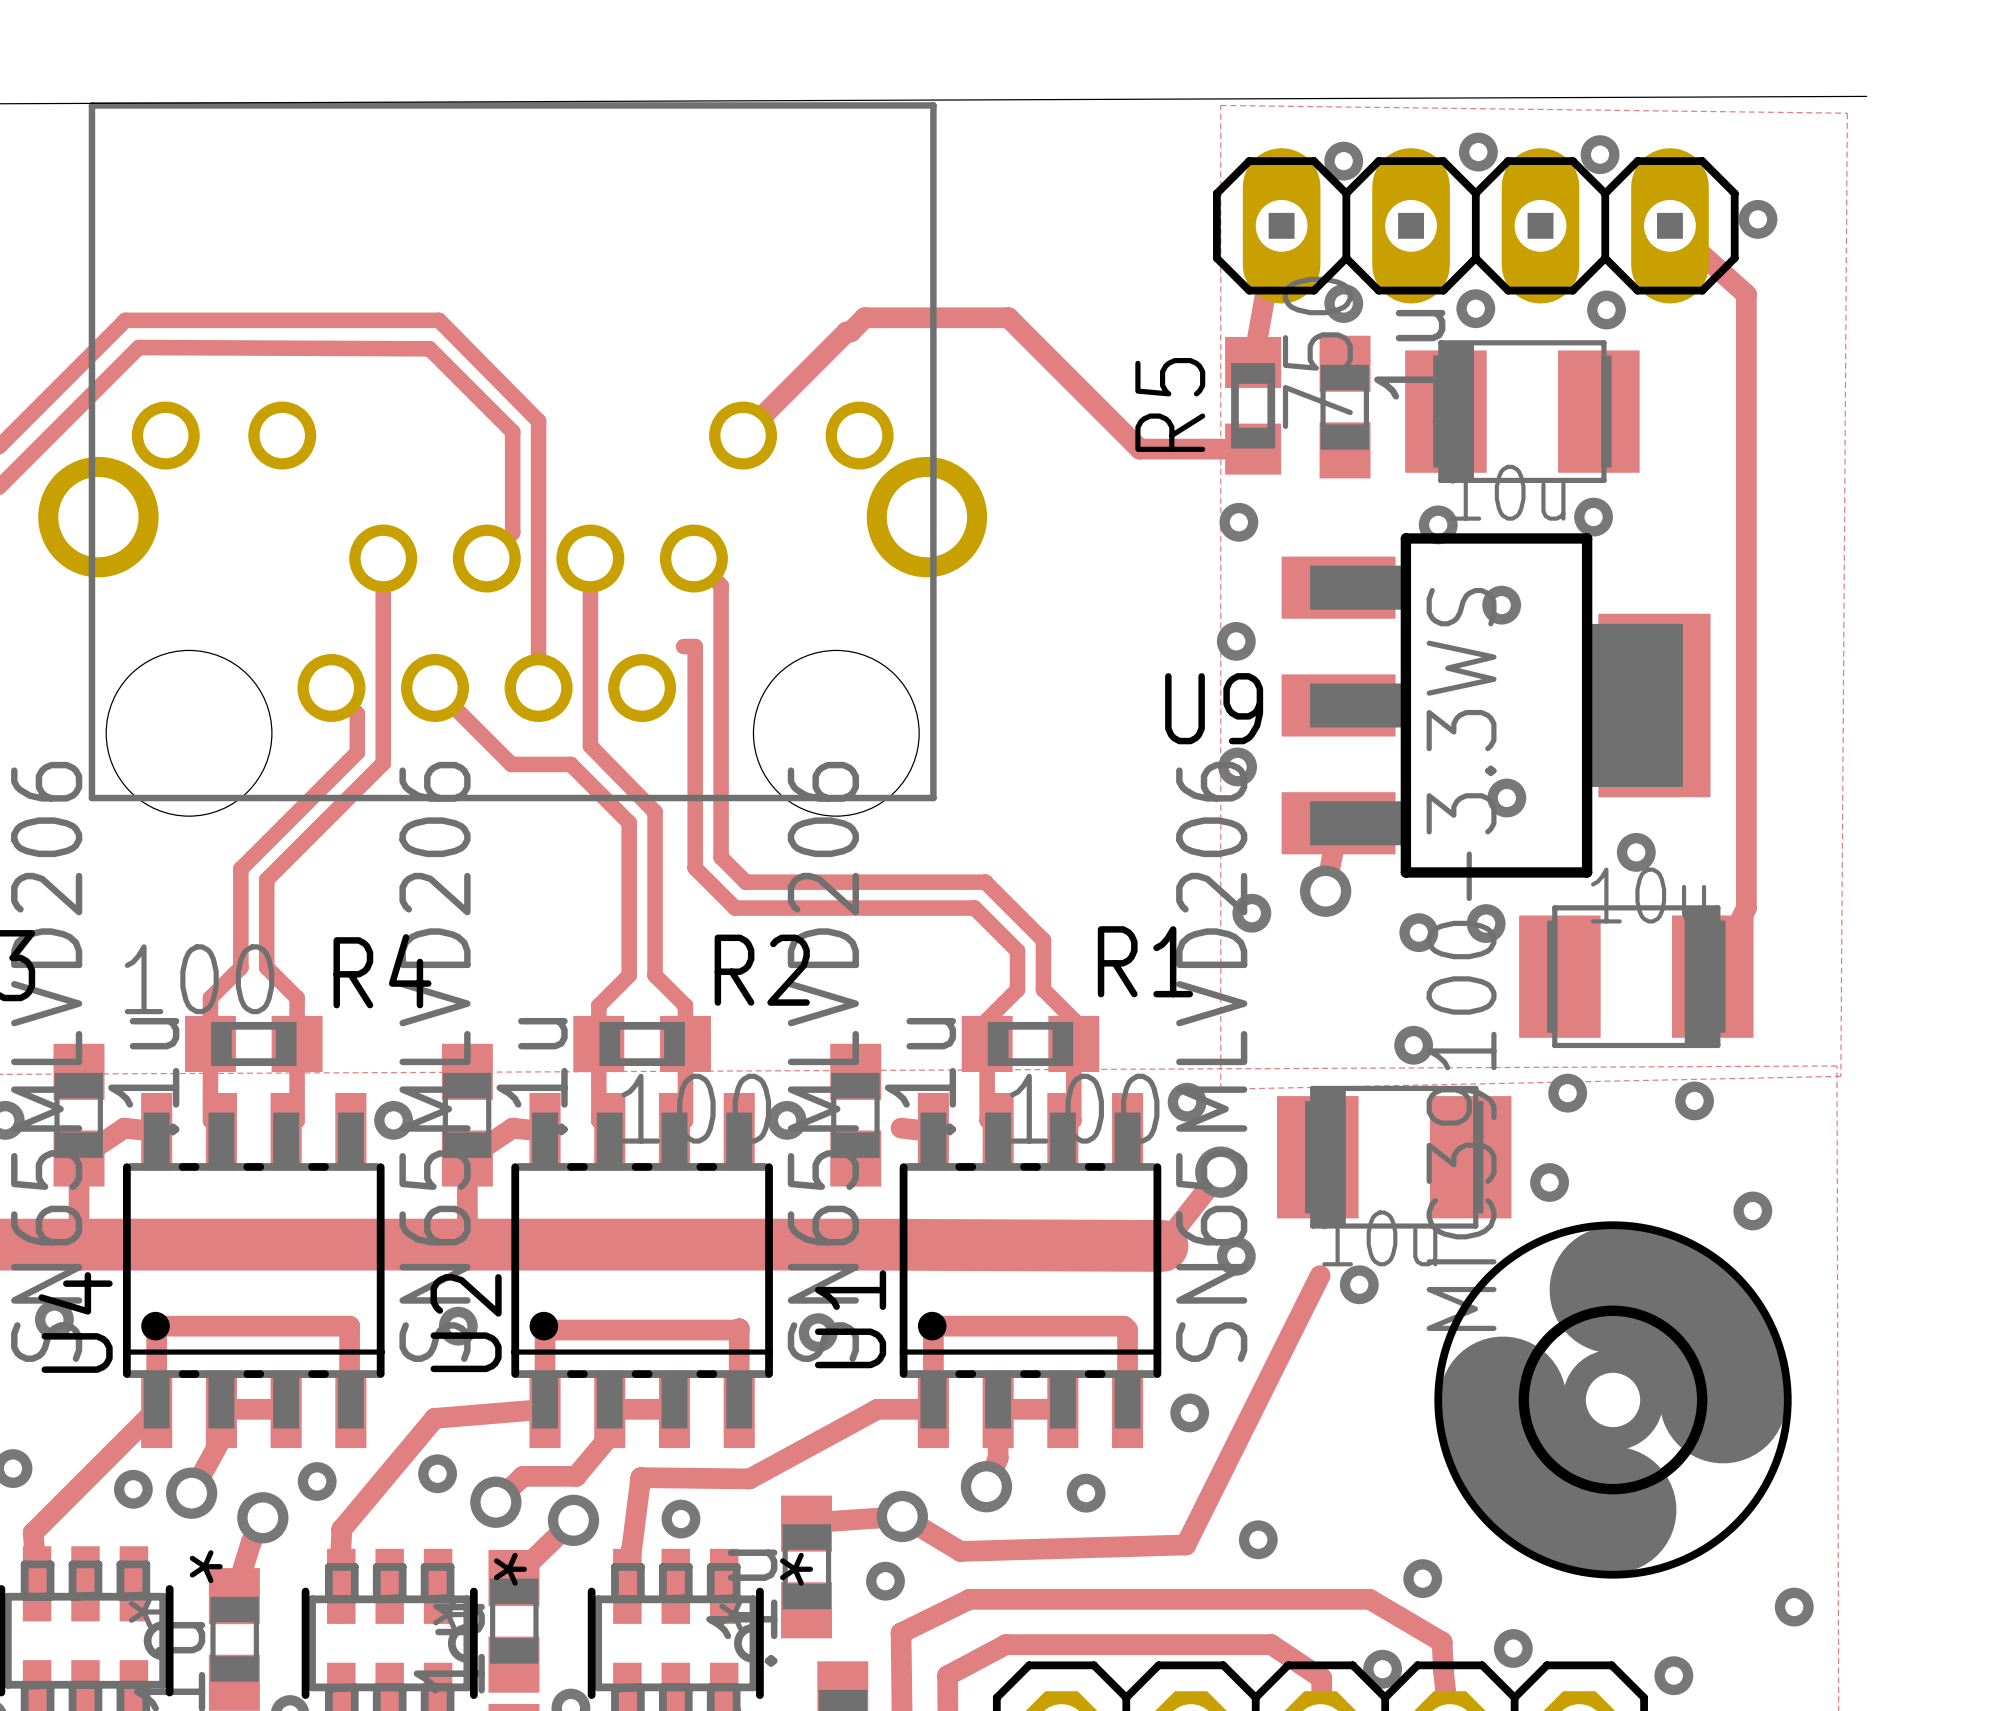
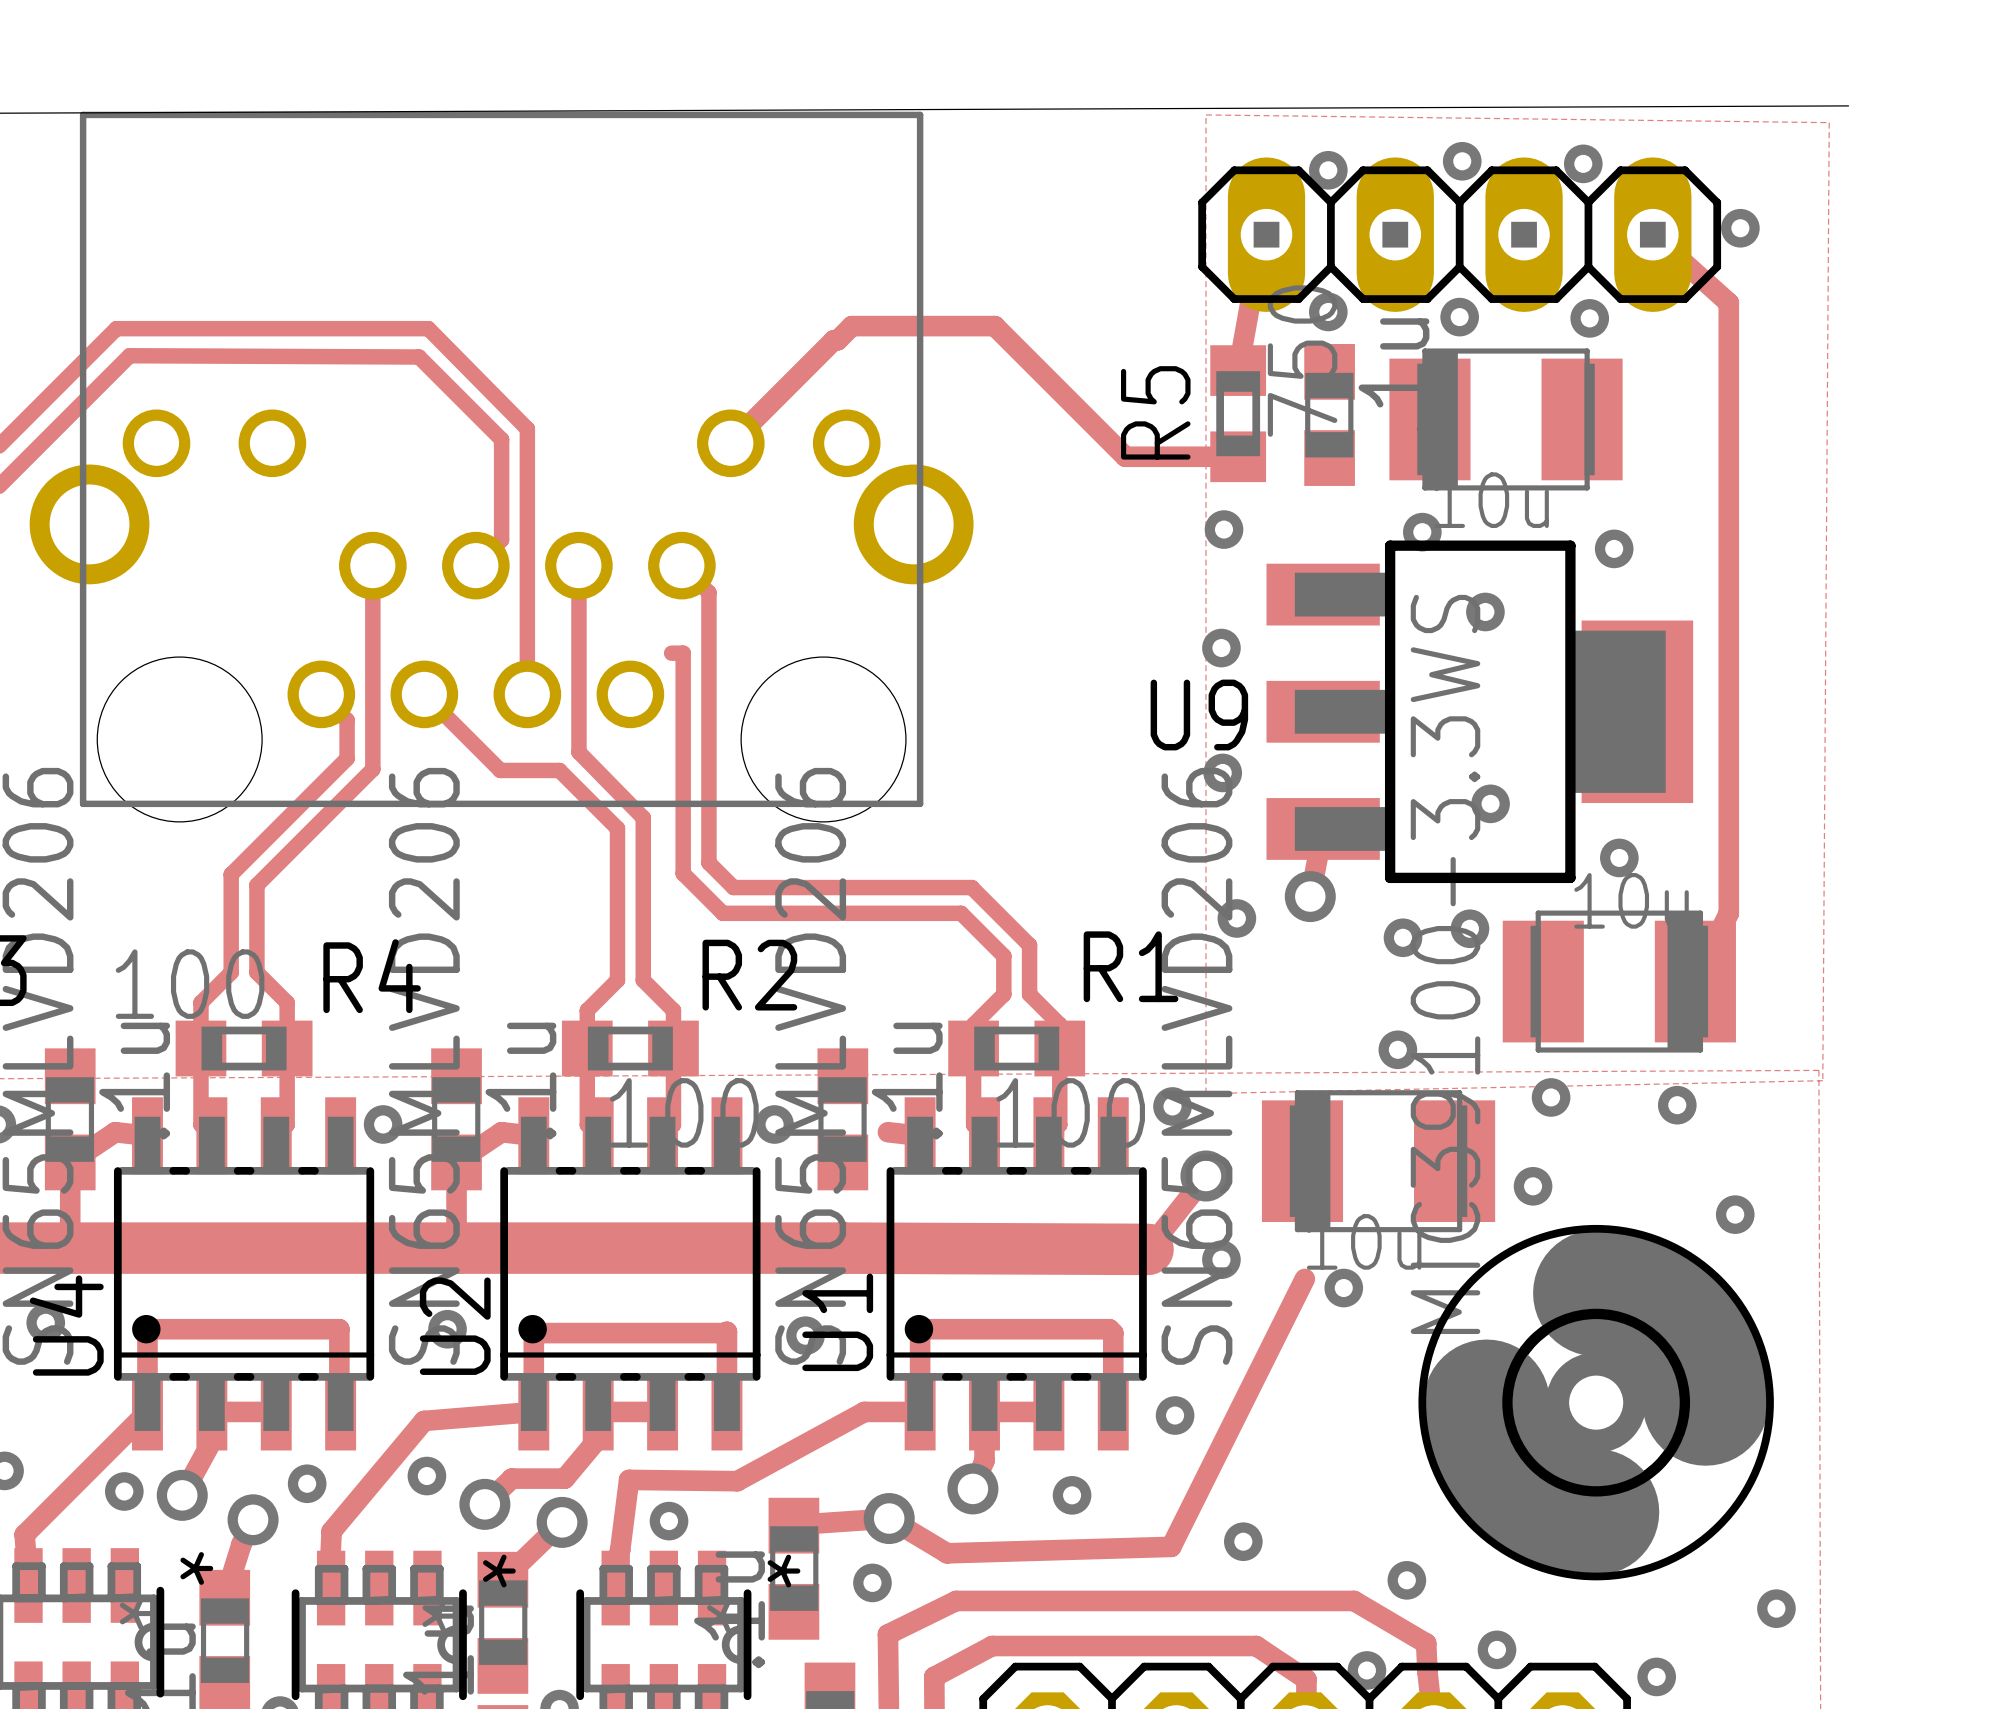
via position: (1593, 517) -> (1614, 548)

